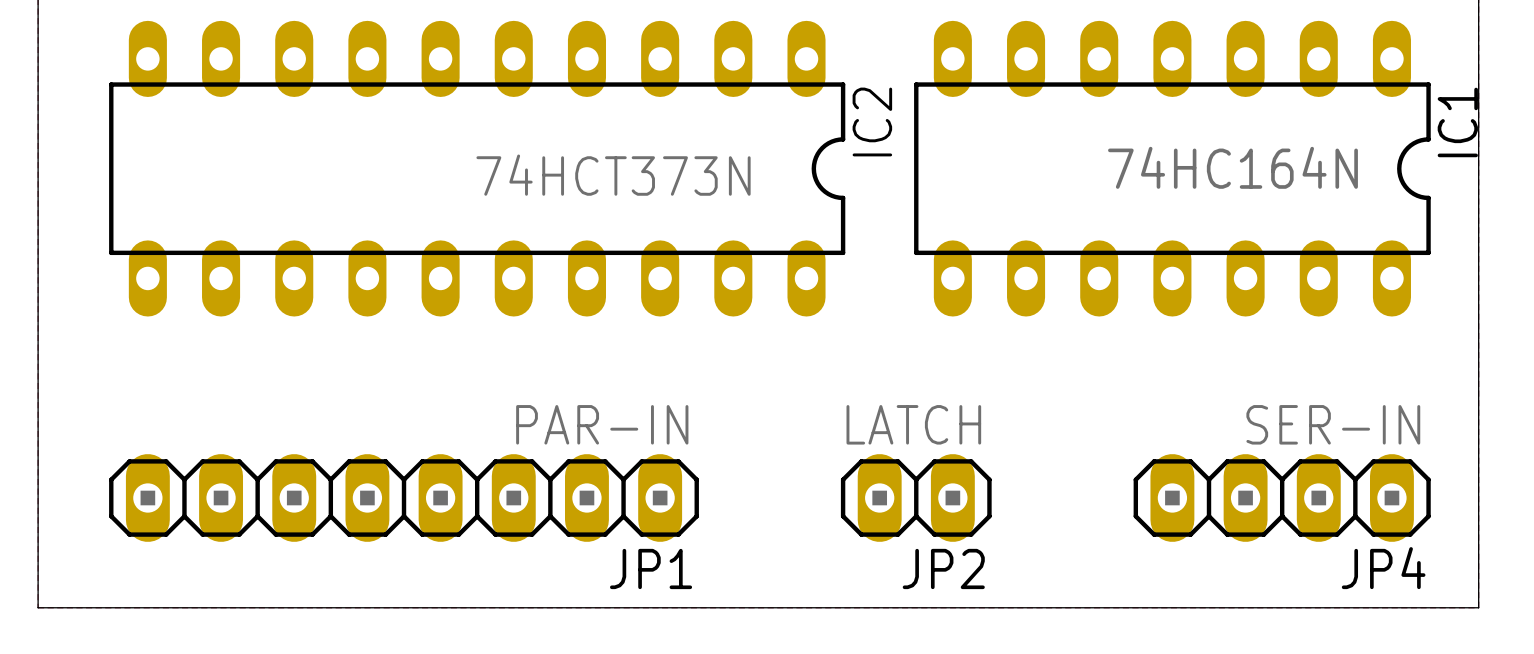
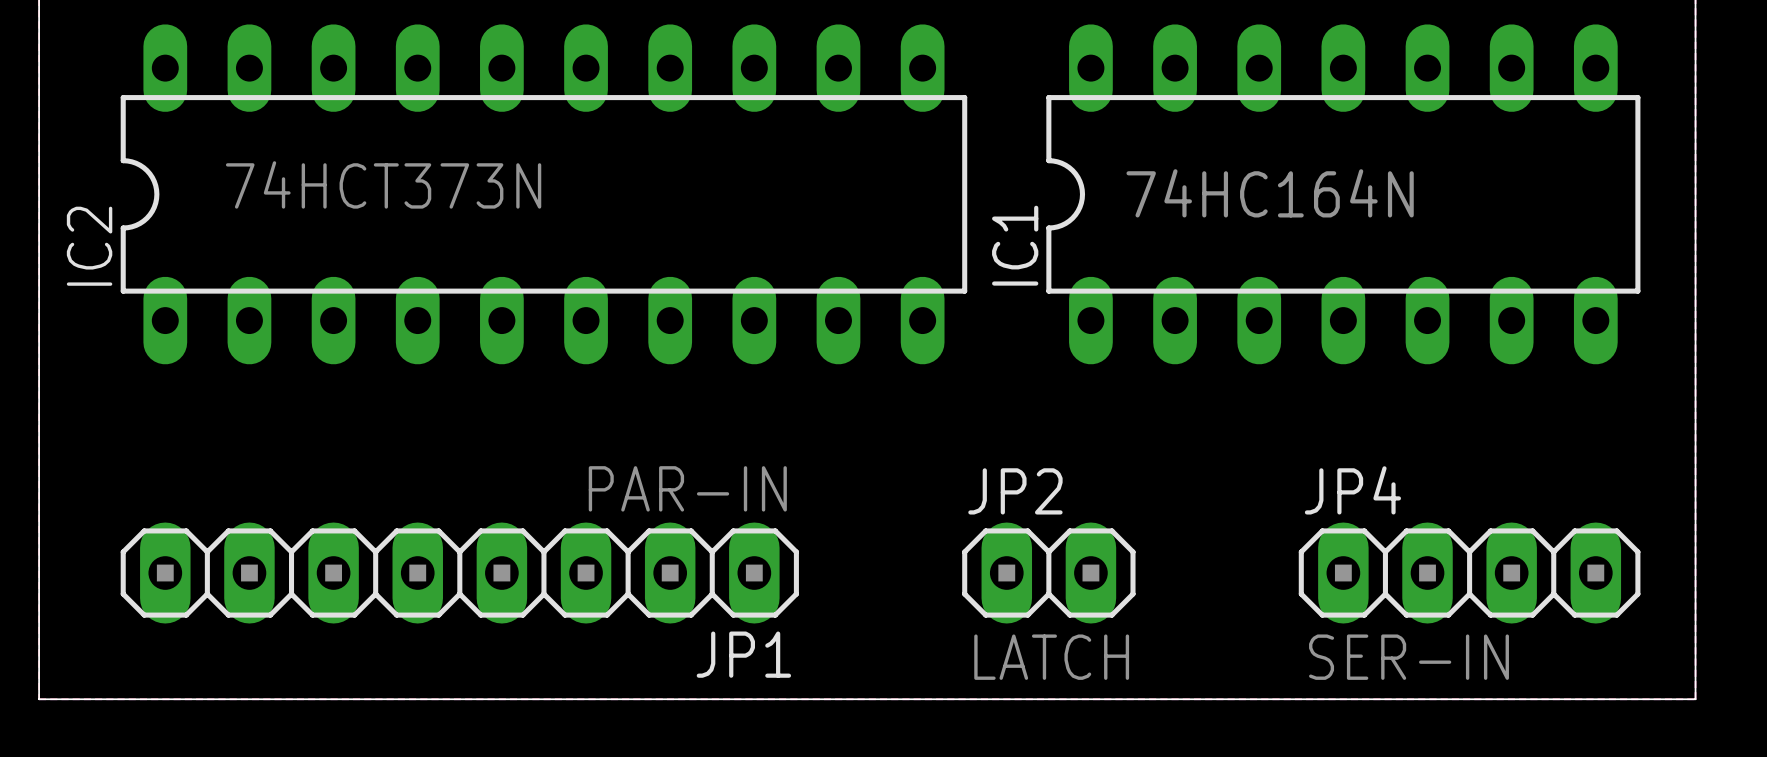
IC2 rotation: 0° (477, 168) -> 180° (543, 194)
IC1 rotation: 0° (1172, 168) -> 180° (1343, 194)
JP2 value position: LATCH (913, 424) -> LATCH (1051, 657)
JP4 value position: SER-IN (1333, 424) -> SER-IN (1409, 657)
JP2 name position: JP2 (943, 568) -> JP2 (1015, 491)
JP4 name position: JP4 (1383, 568) -> JP4 (1352, 490)

